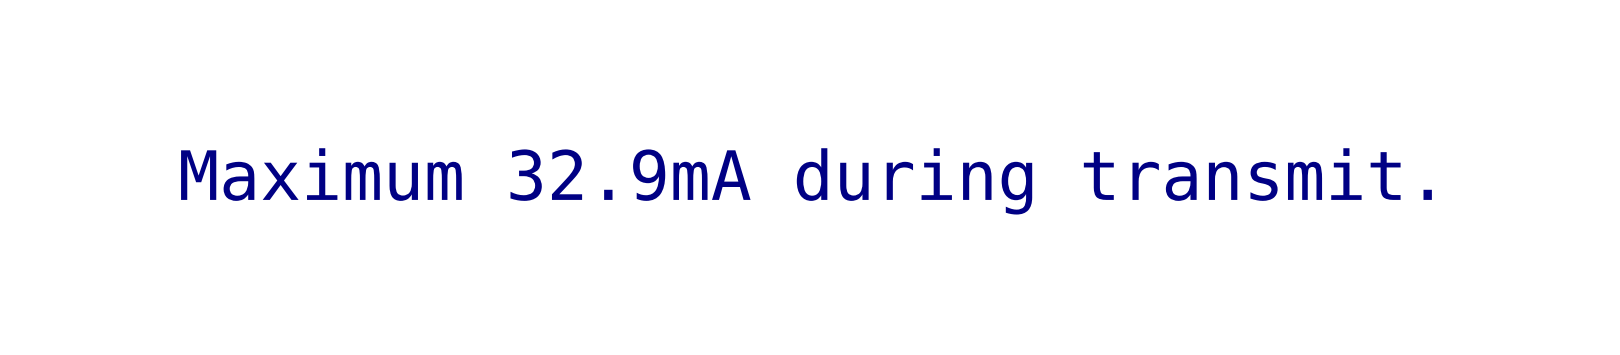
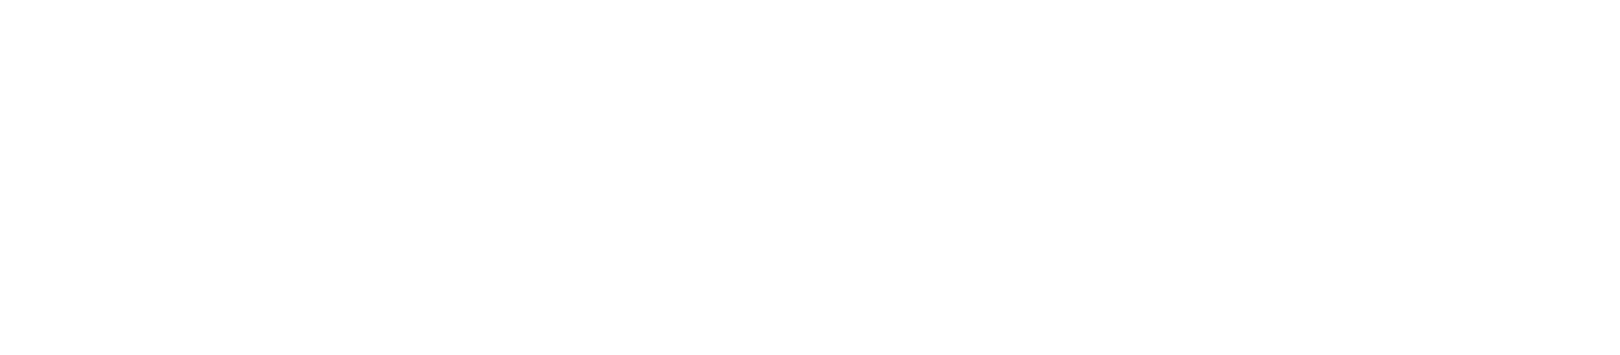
text: Maximum 32.9mA during transmit. (806, 181) -> none

